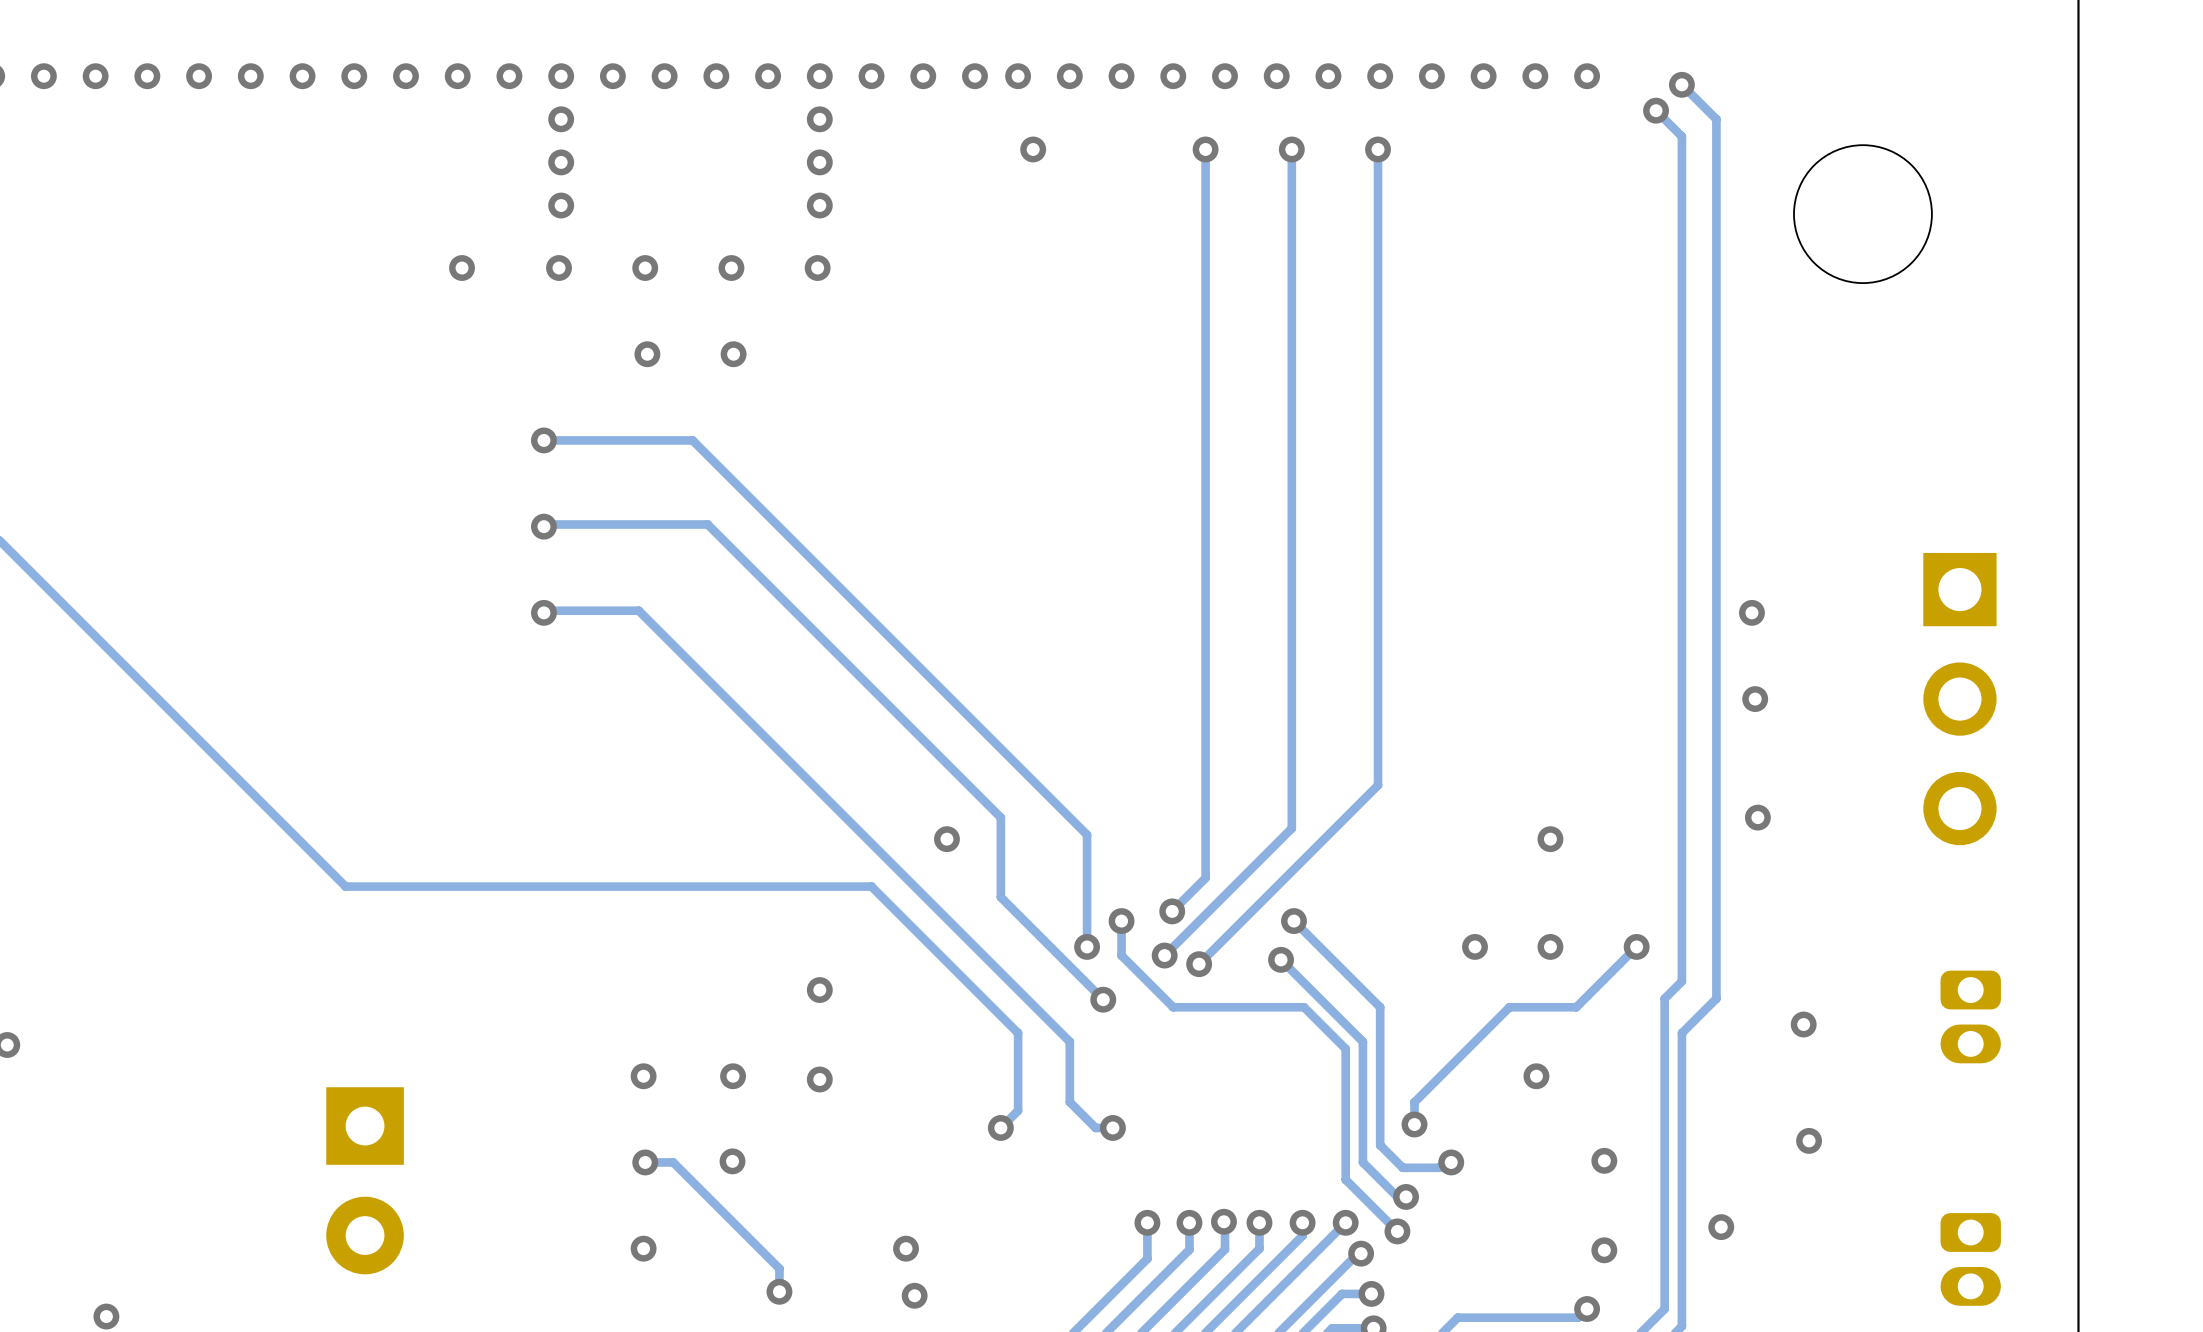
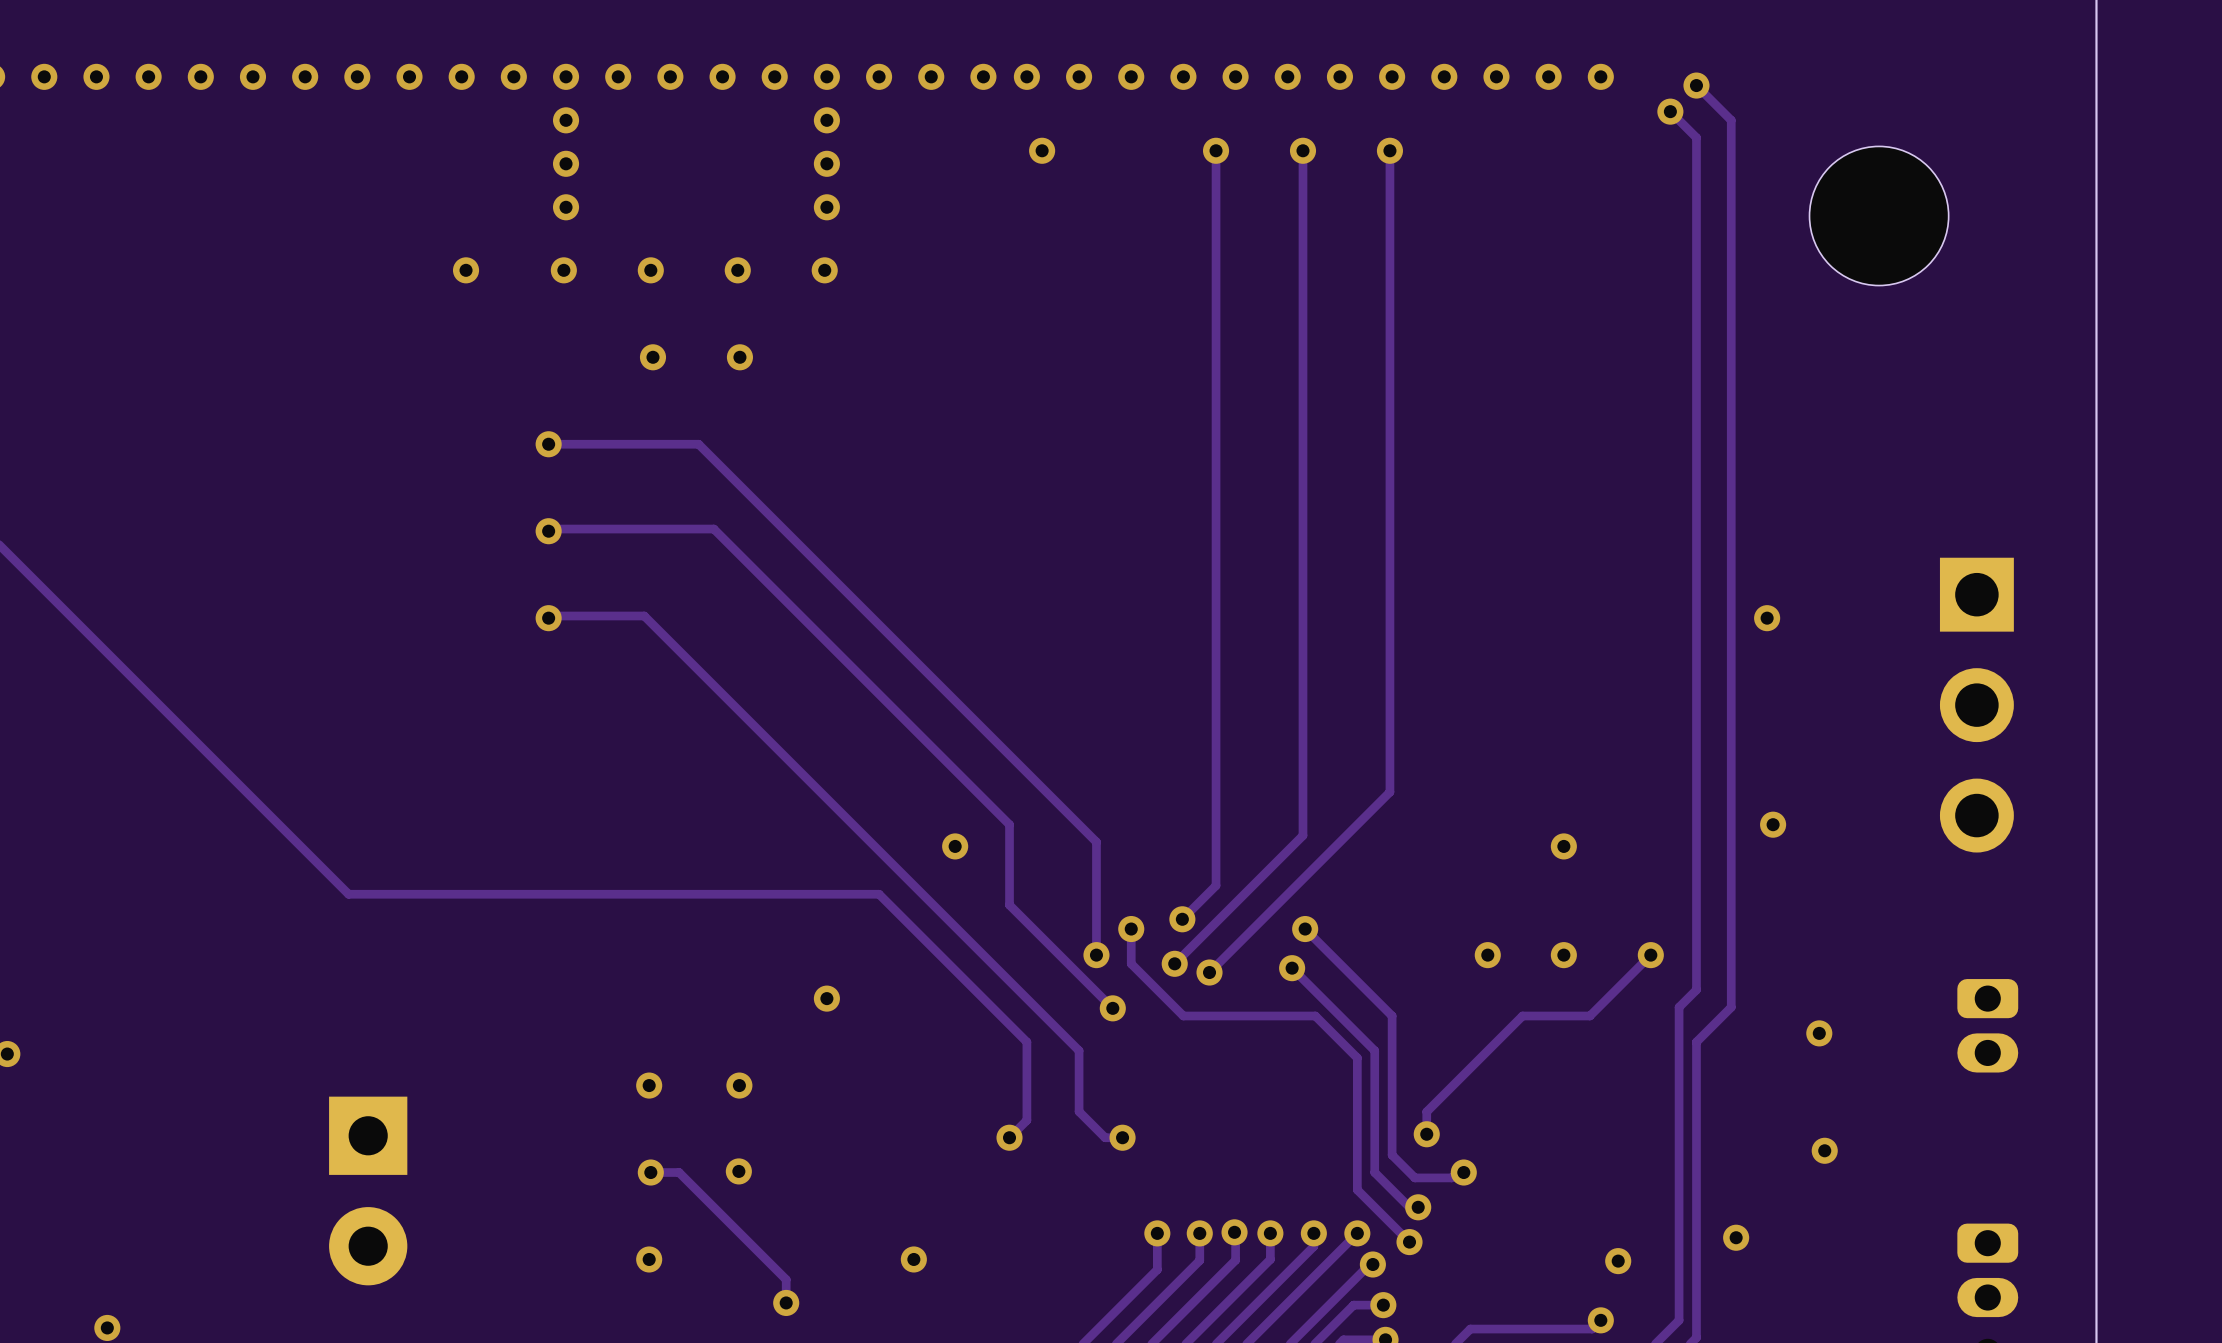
via: (1755, 699) -> none
via: (1536, 1076) -> none
via: (819, 1079) -> none
via: (1604, 1160) -> none
via: (914, 1295) -> none

